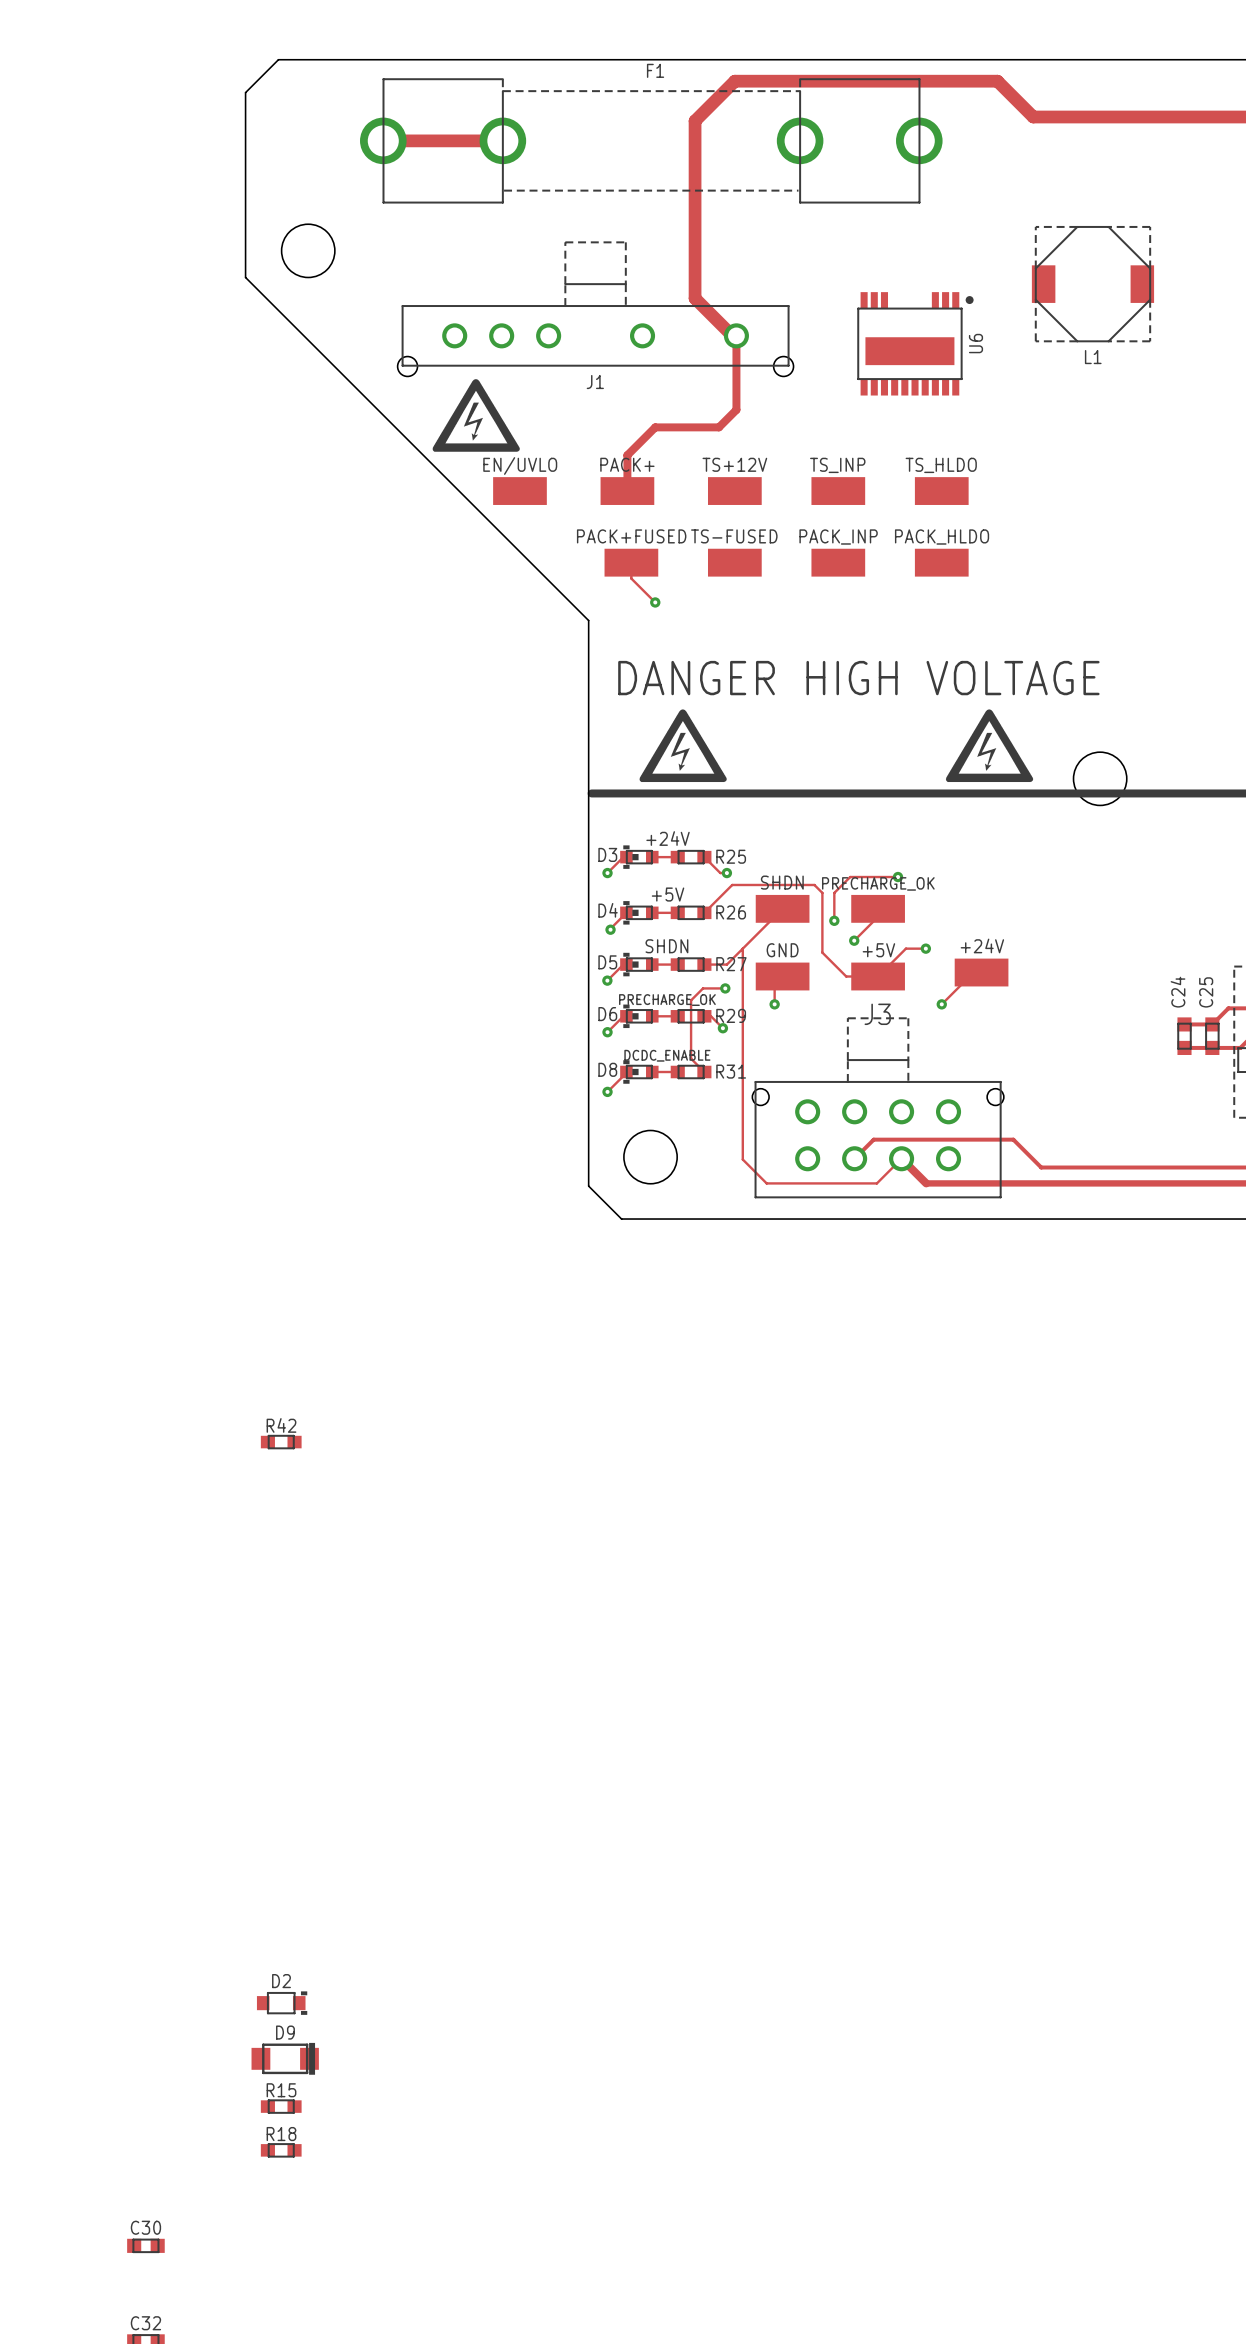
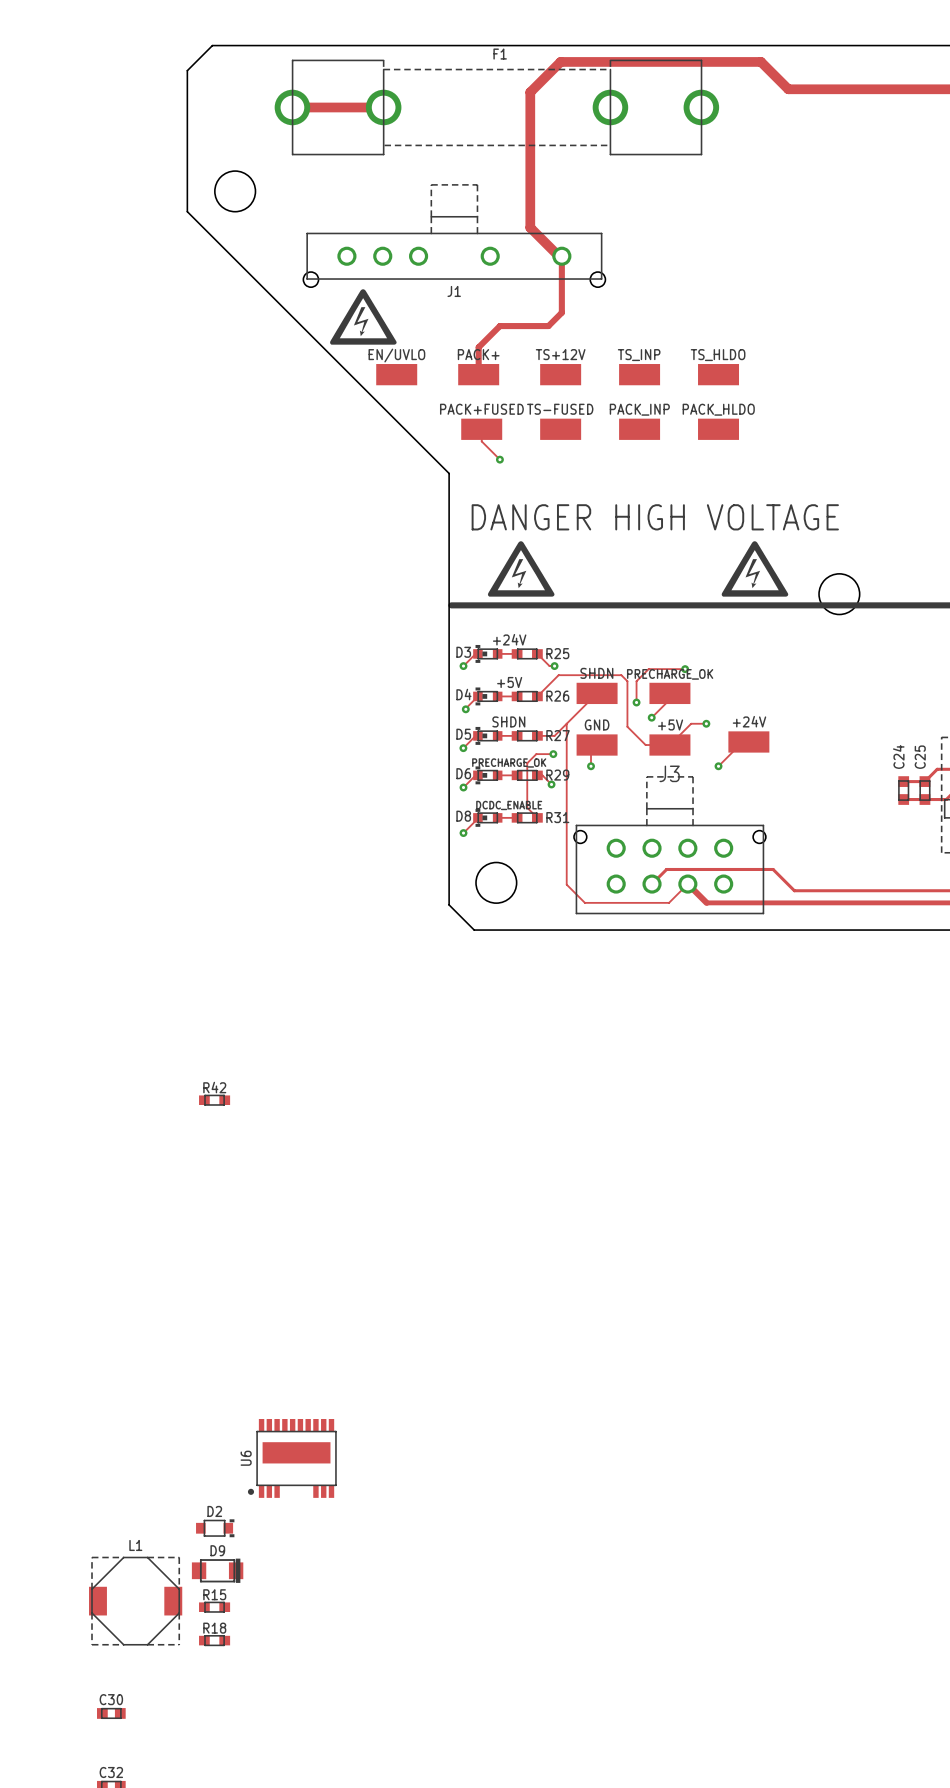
L1 position: (1092, 284) -> (135, 1601)
U6 rotation: 0° (915, 343) -> 180° (292, 1458)
U6 position: (915, 343) -> (292, 1458)
L1 name position: L1 (1093, 357) -> L1 (135, 1545)

